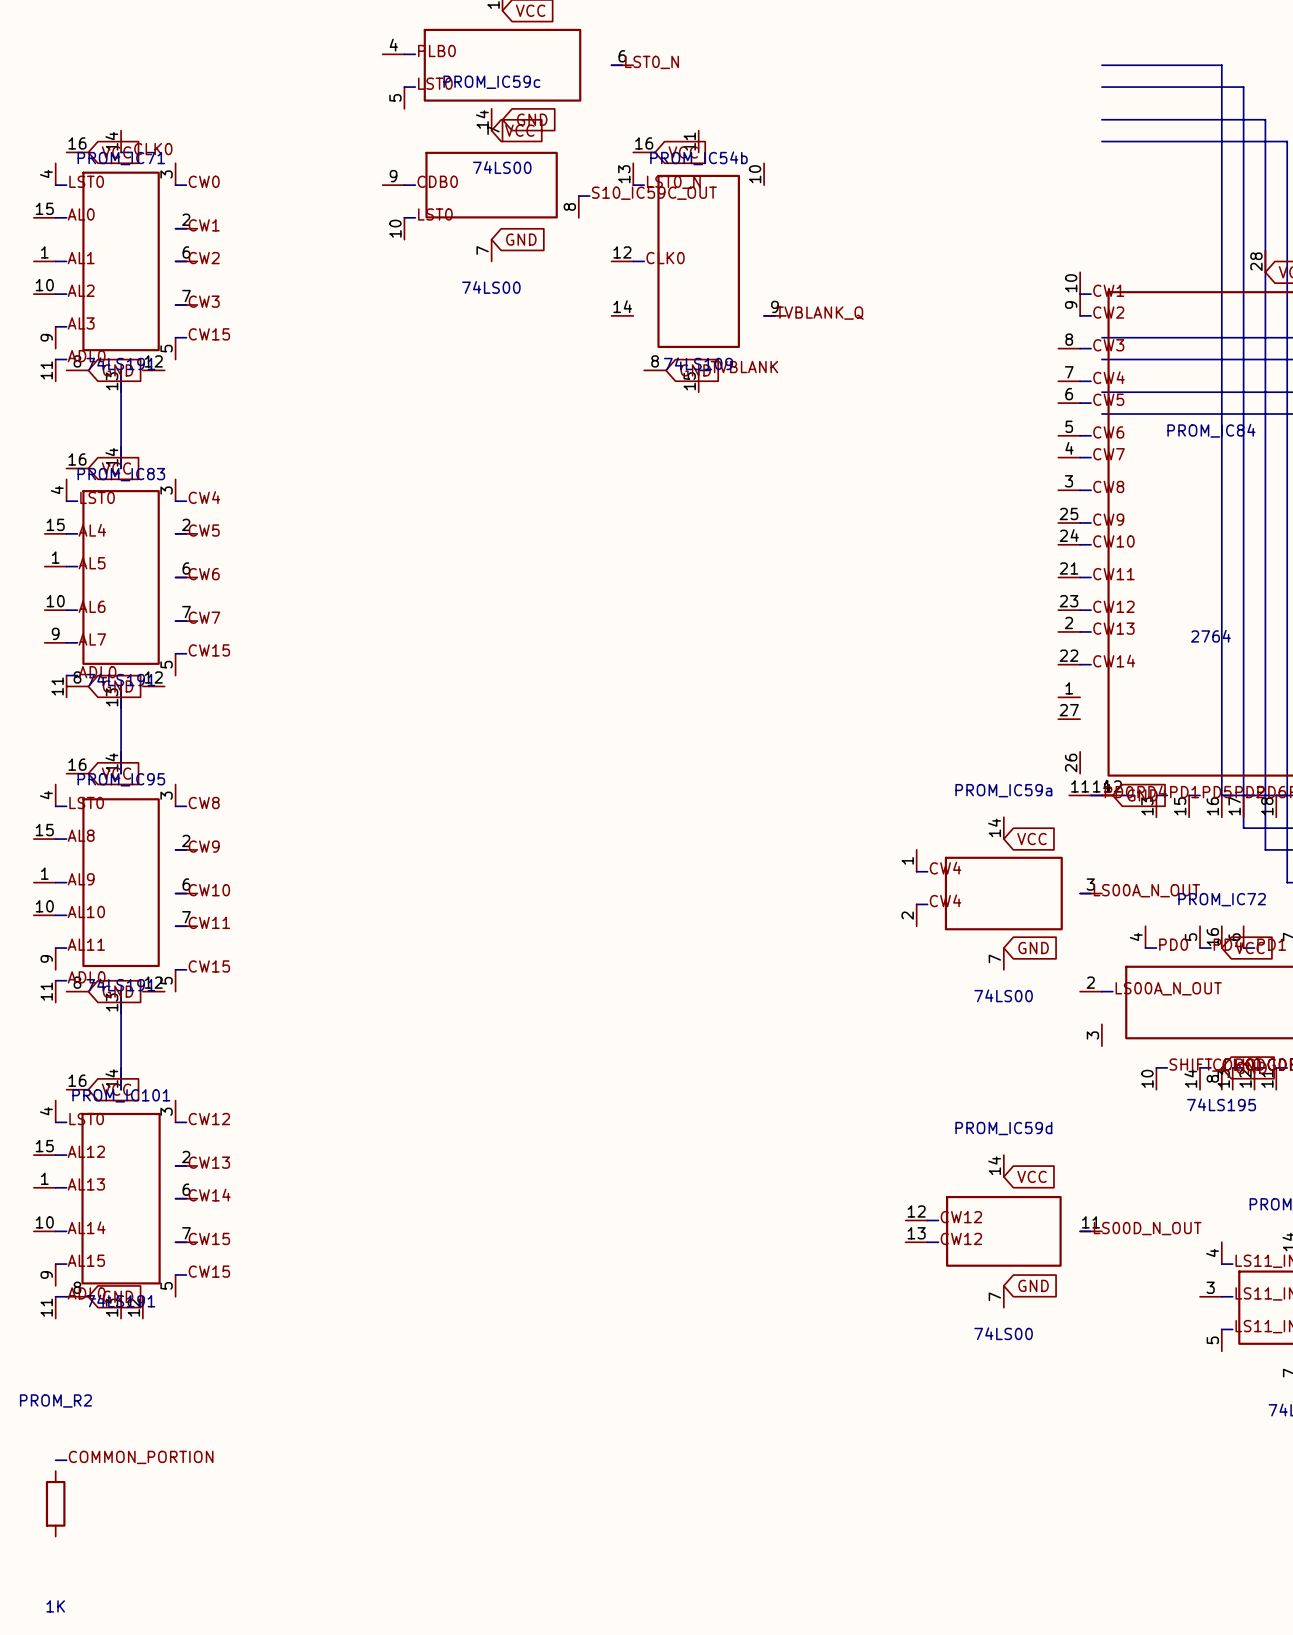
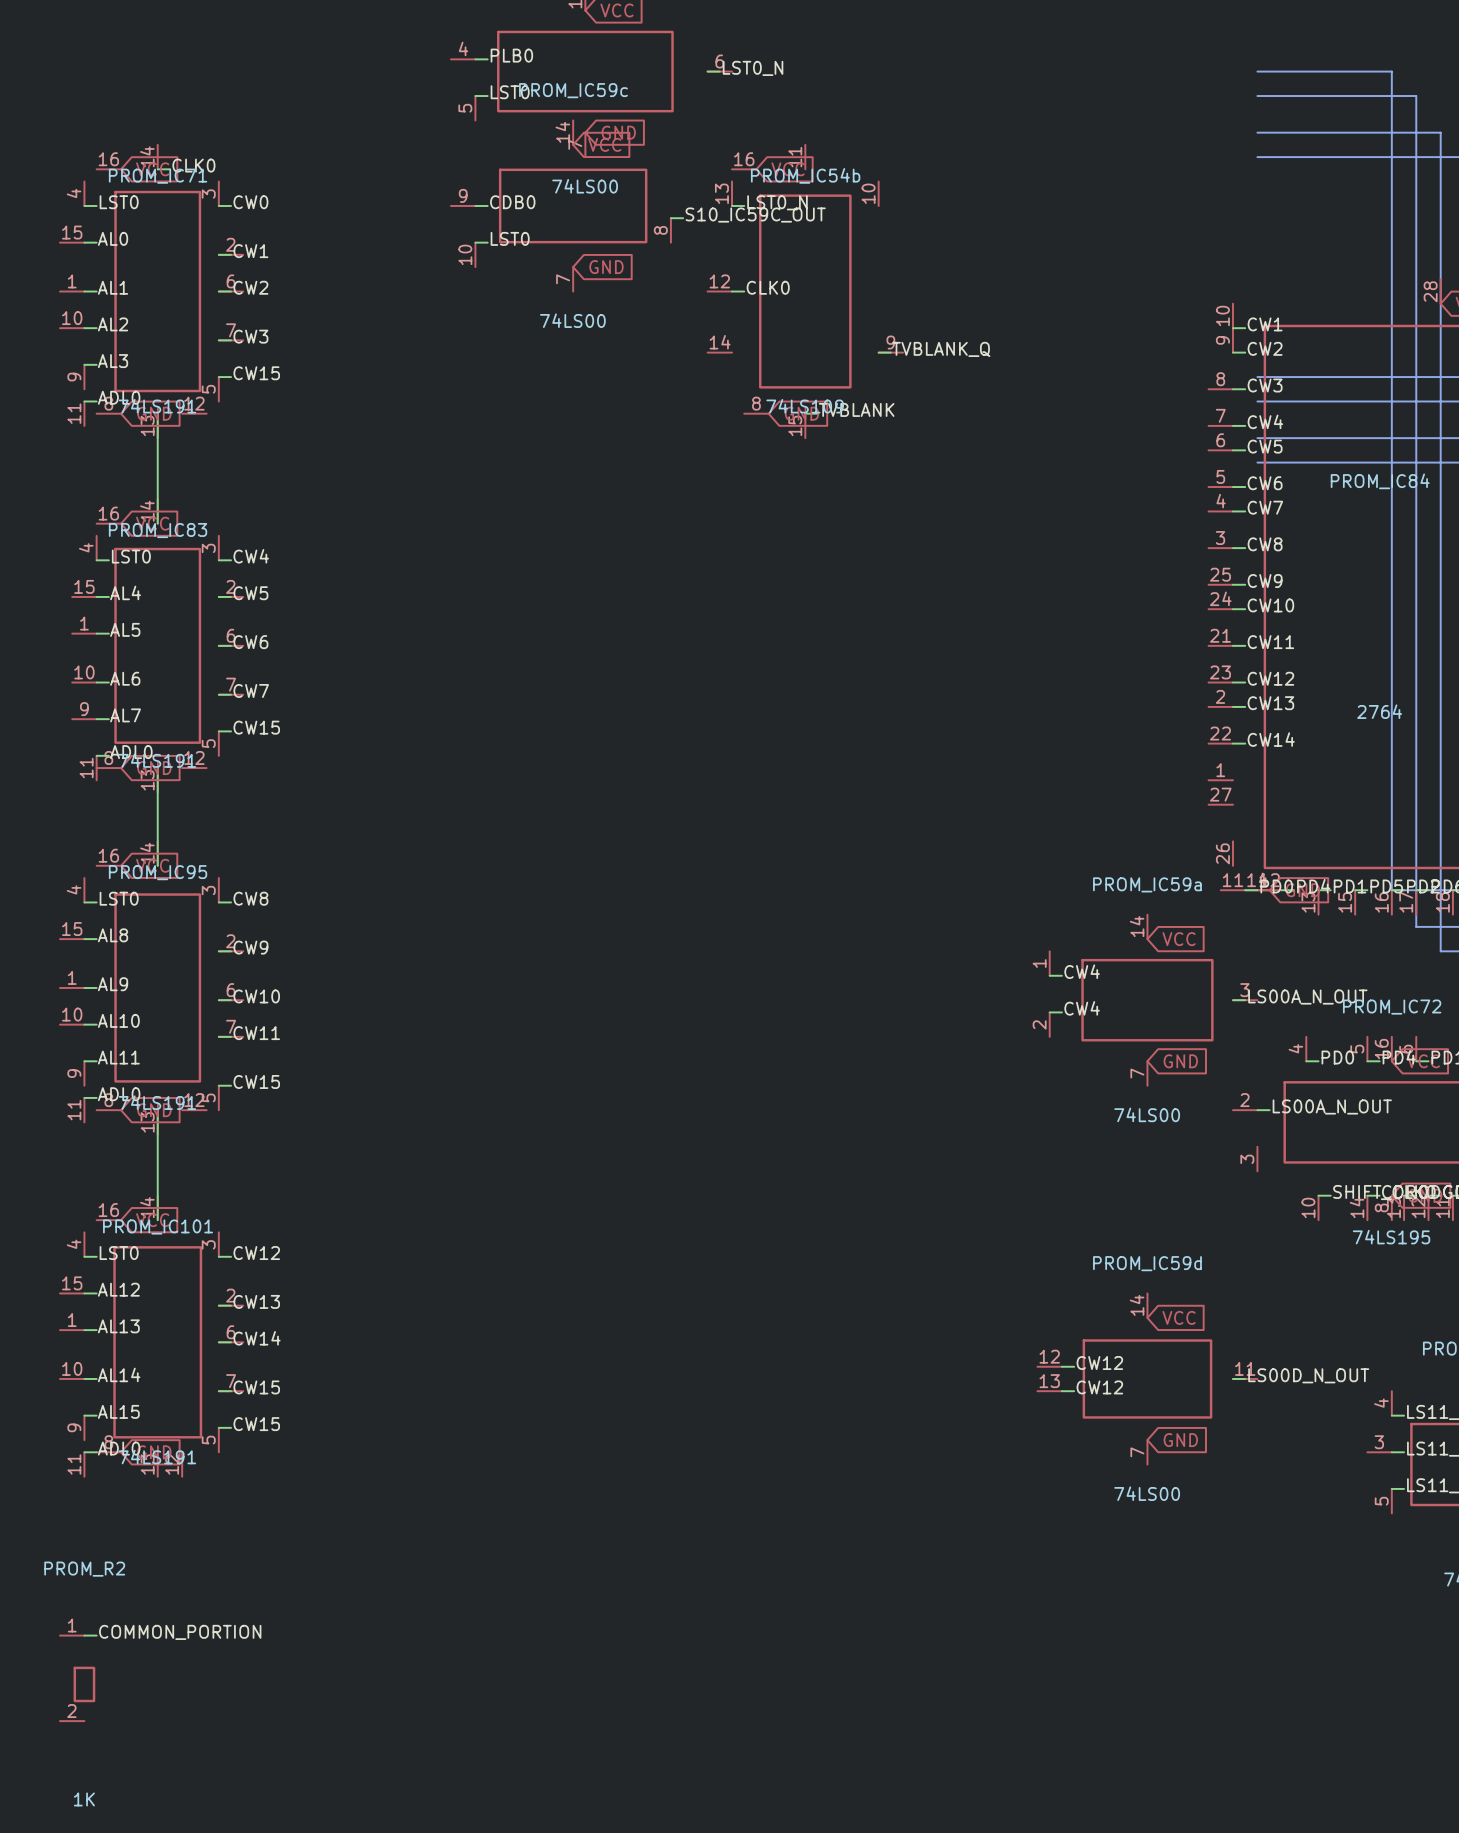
PROM_R2 symbol: [45, 1471, 66, 1537] -> [59, 1635, 96, 1722]

